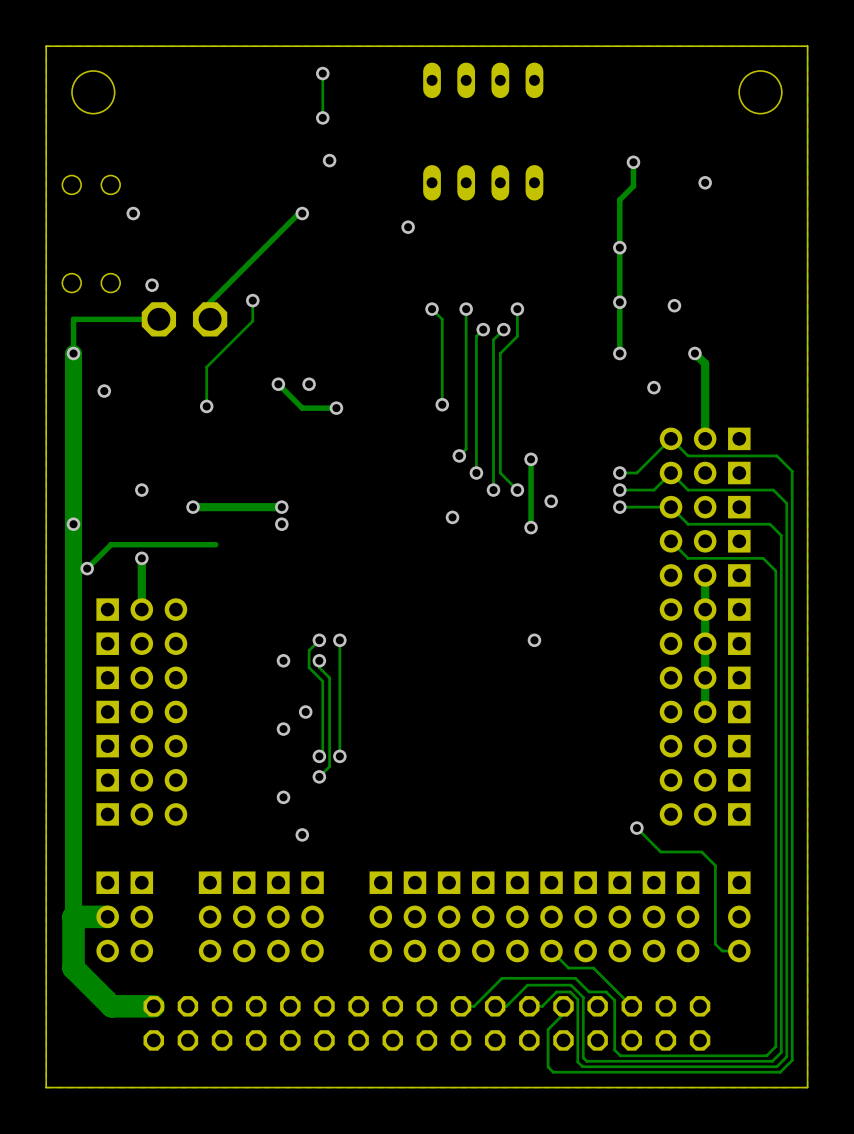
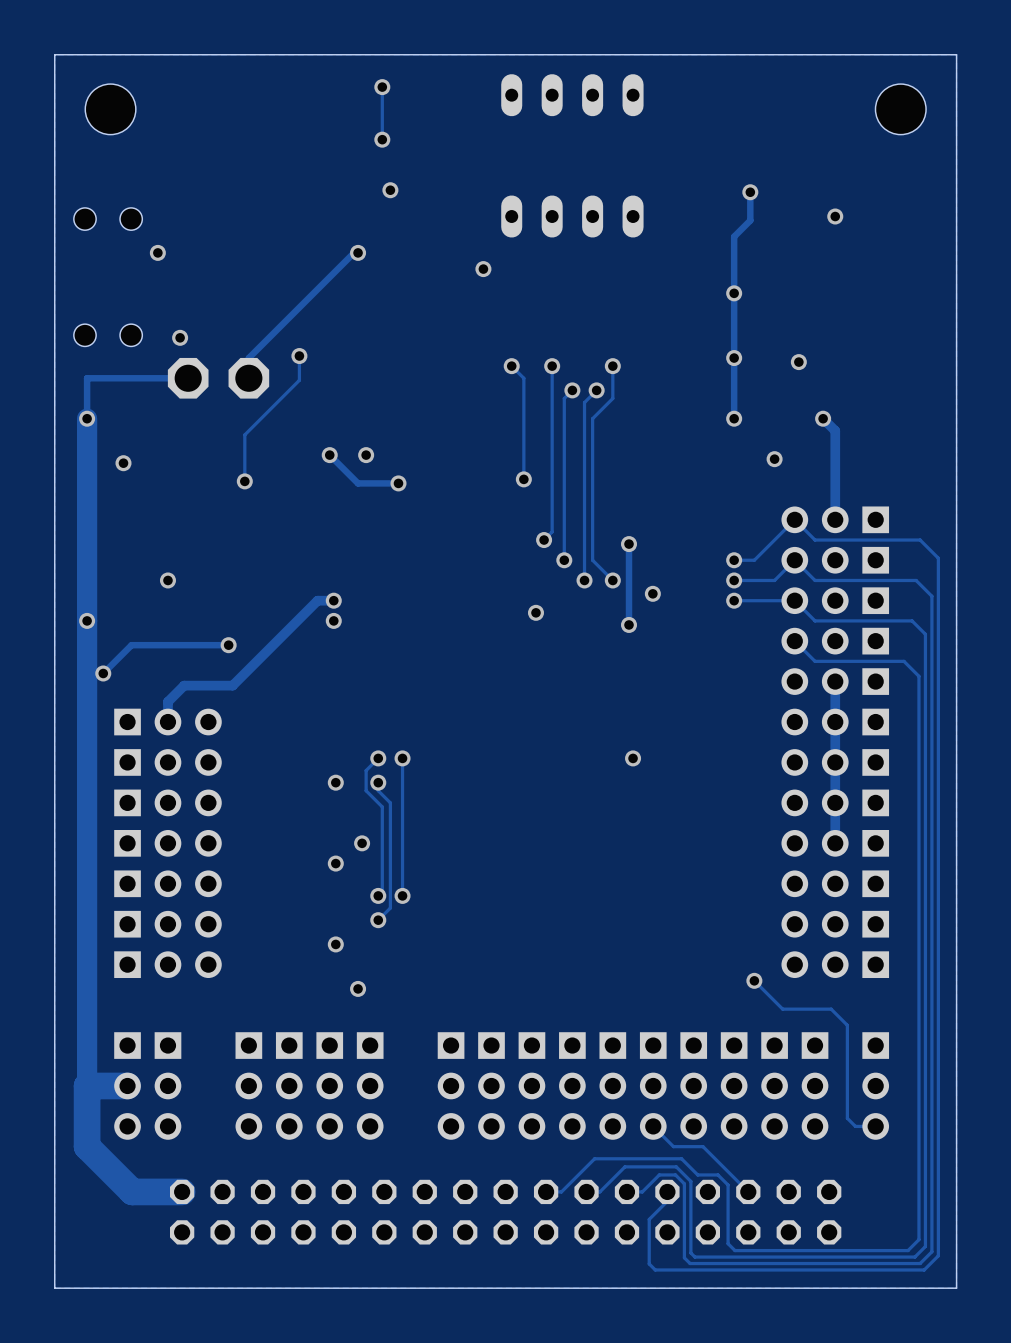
via: (193, 507) -> none
track: (268, 507) (193, 507) -> (317, 600) (232, 685) (184, 685) (167, 701)
via: none -> (228, 645)
track: (215, 544) (193, 544) -> none
track: (141, 558) (141, 592) -> none
via: (141, 558) -> none

